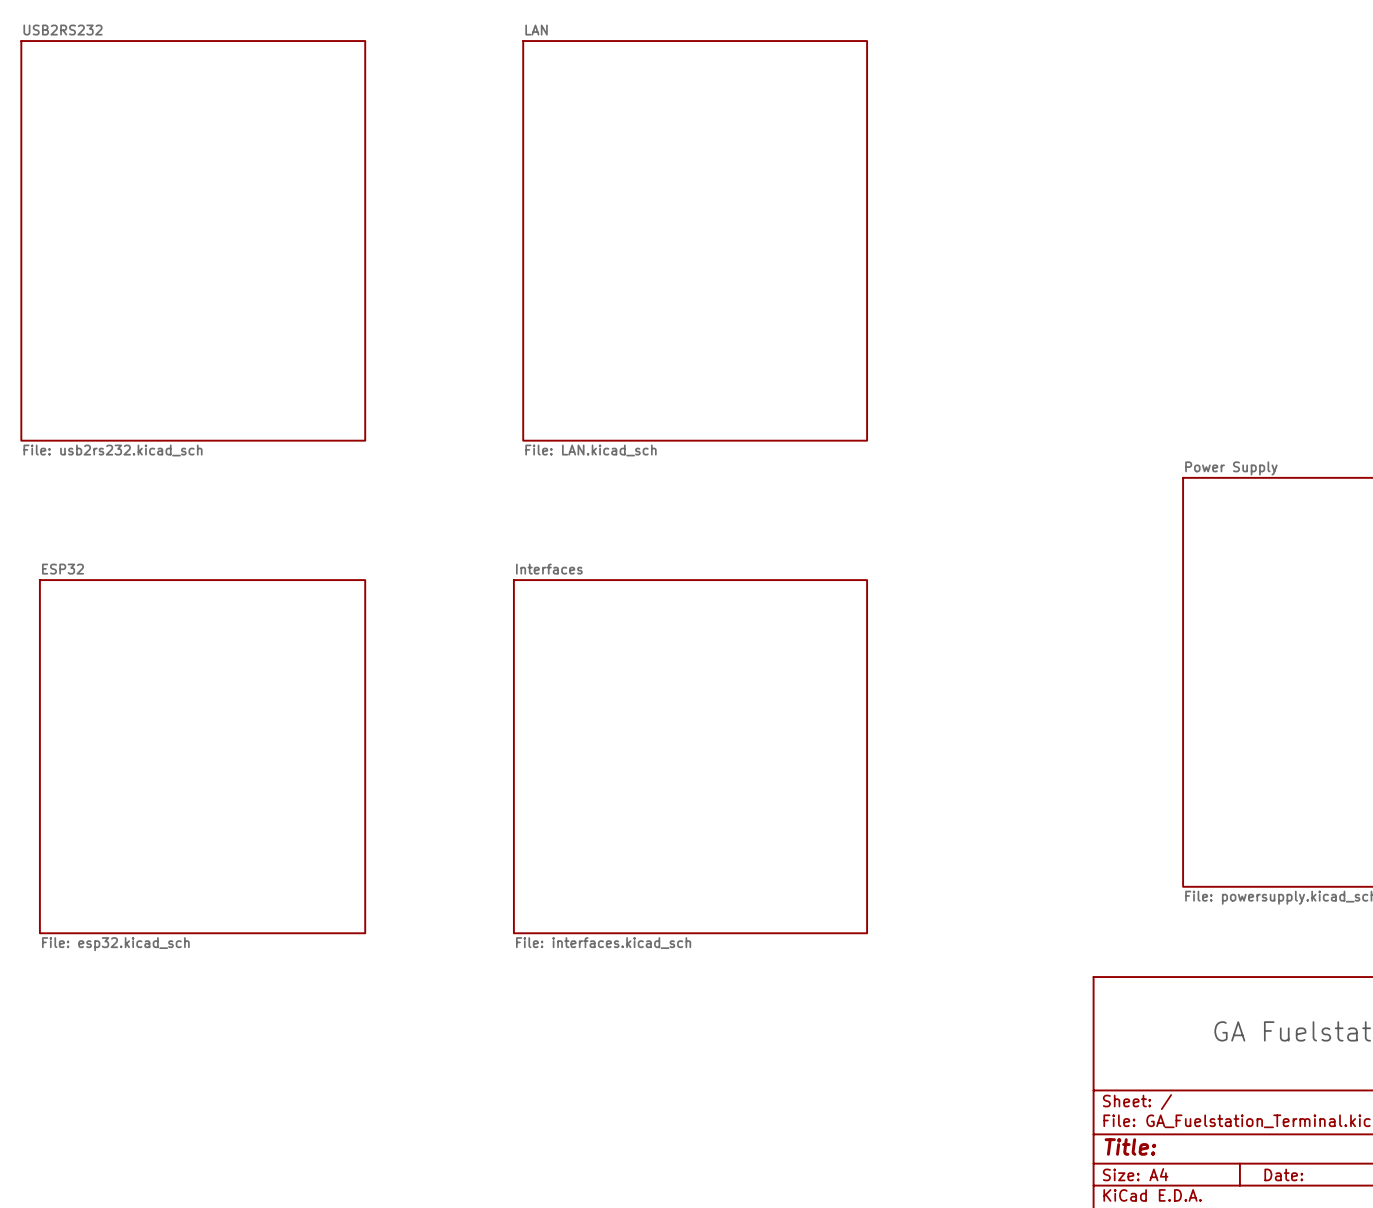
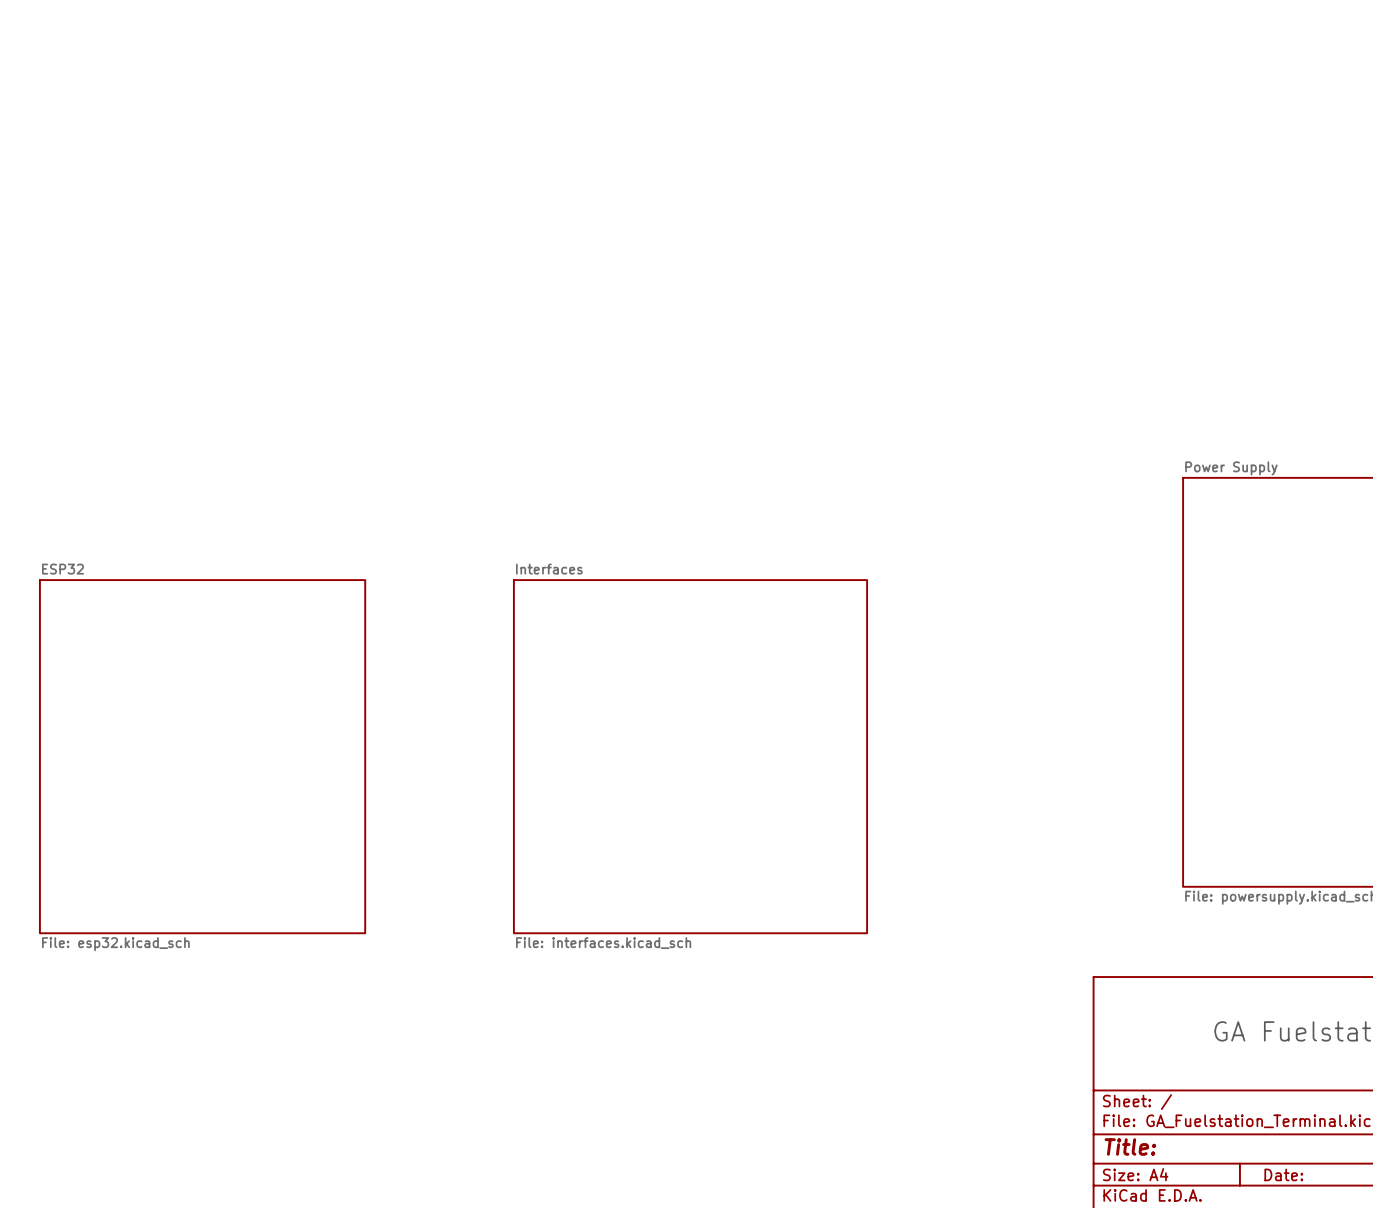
sheet USB2RS232: File: usb2rs232.kicad_sch (193, 240) -> none
sheet LAN: File: LAN.kicad_sch (695, 240) -> none

